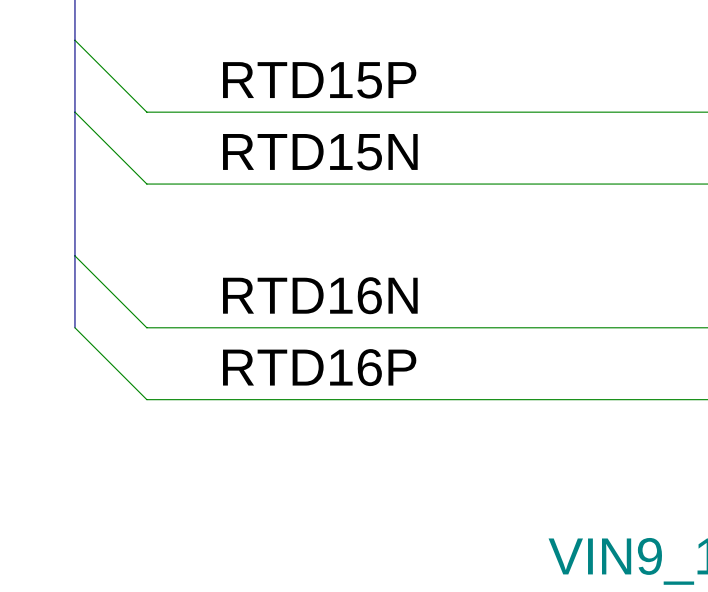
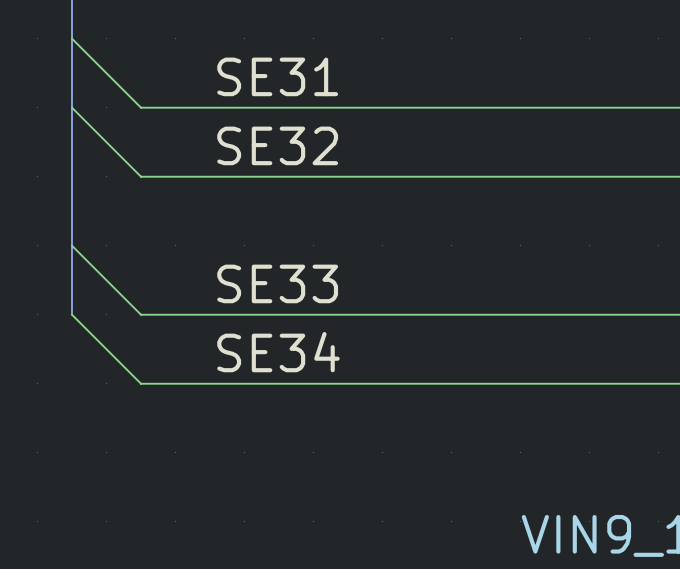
label: RTD15P (319, 80) -> SE31 (277, 76)
label: RTD15N (320, 152) -> SE32 (277, 145)
label: RTD16N (320, 295) -> SE33 (277, 283)
label: RTD16P (319, 367) -> SE34 (278, 352)

